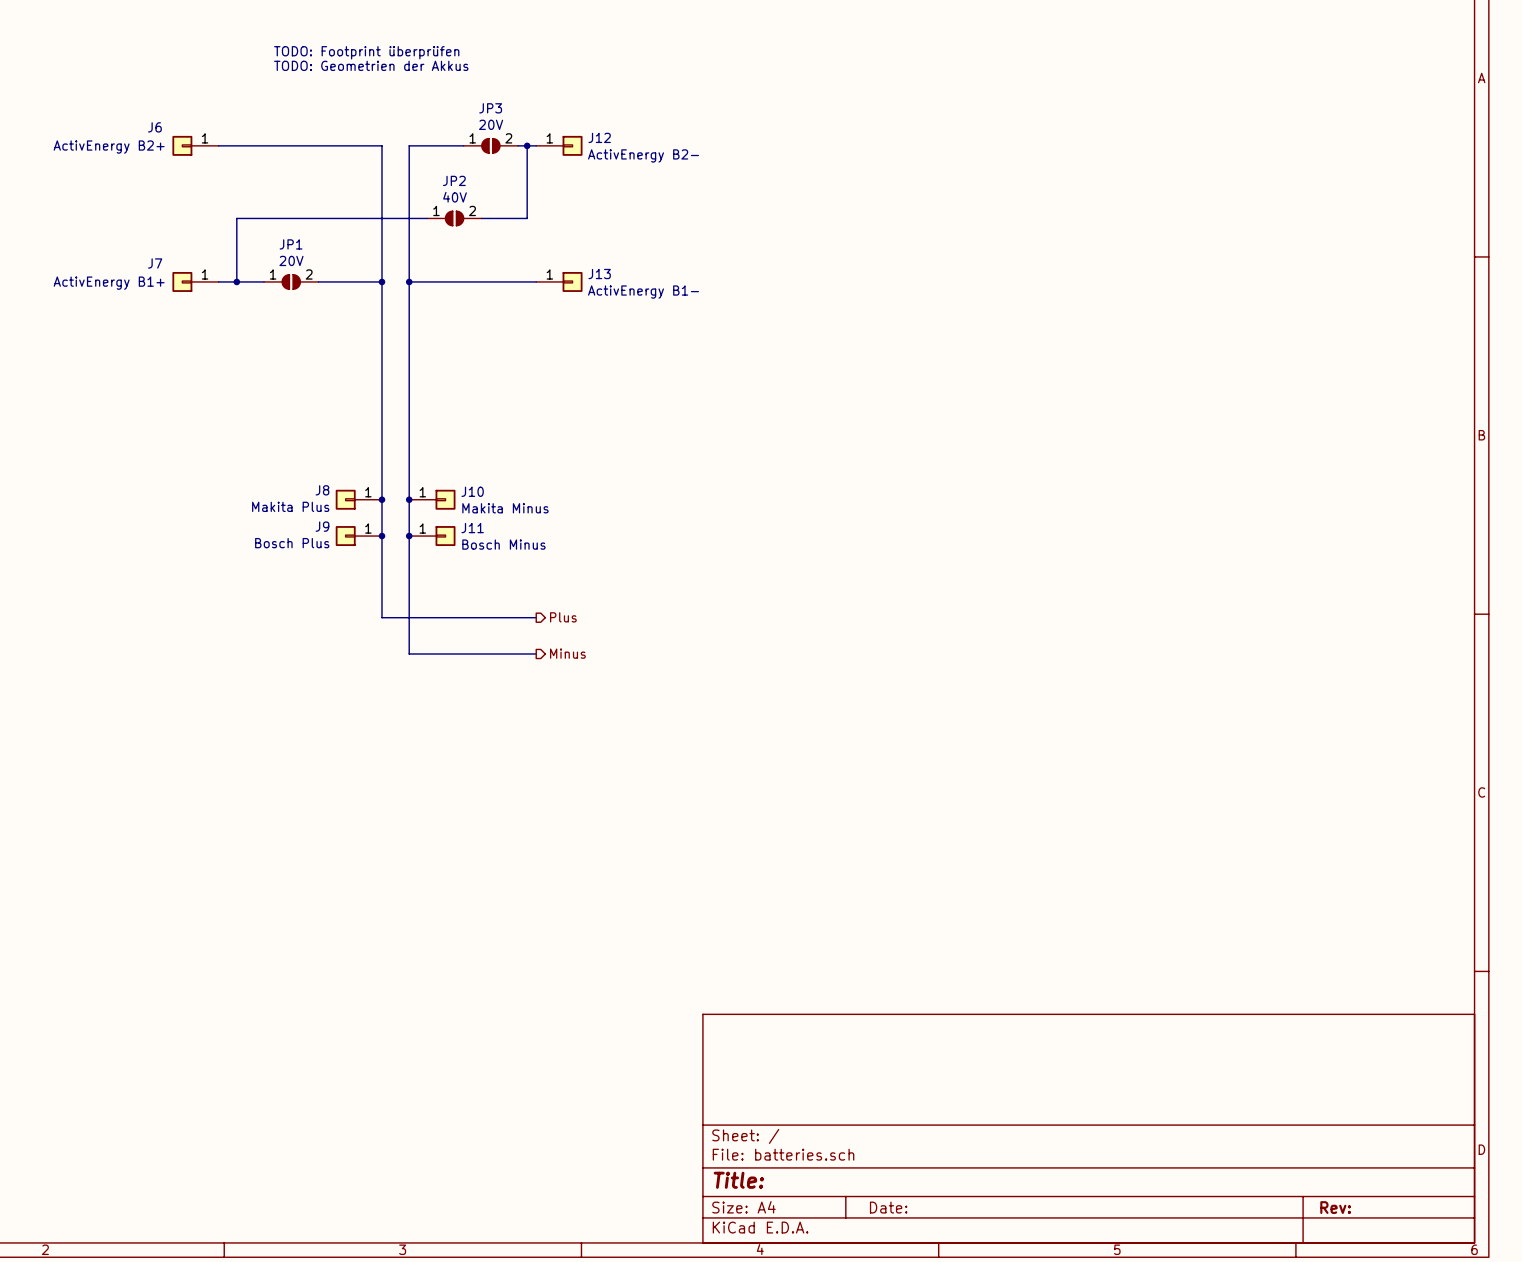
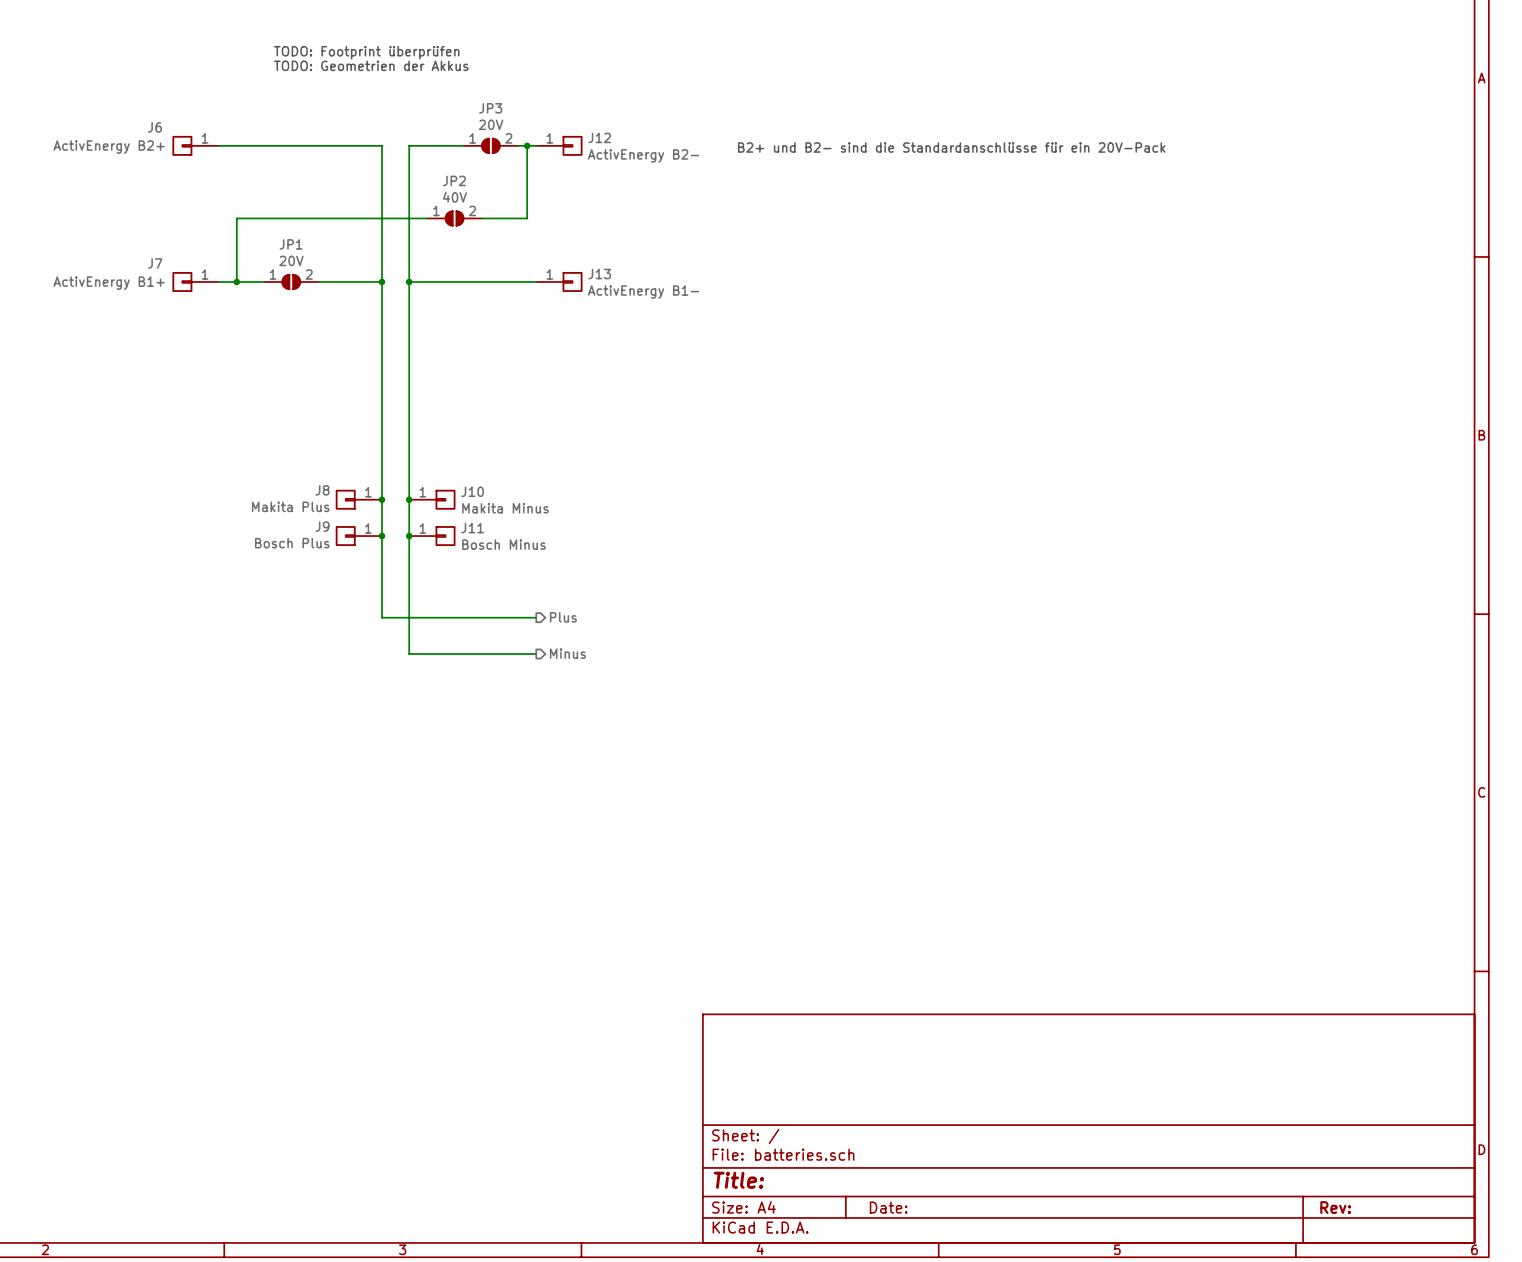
text: none -> B2+ und B2- sind die Standardanschlüsse für ein 20V-Pack (951, 147)

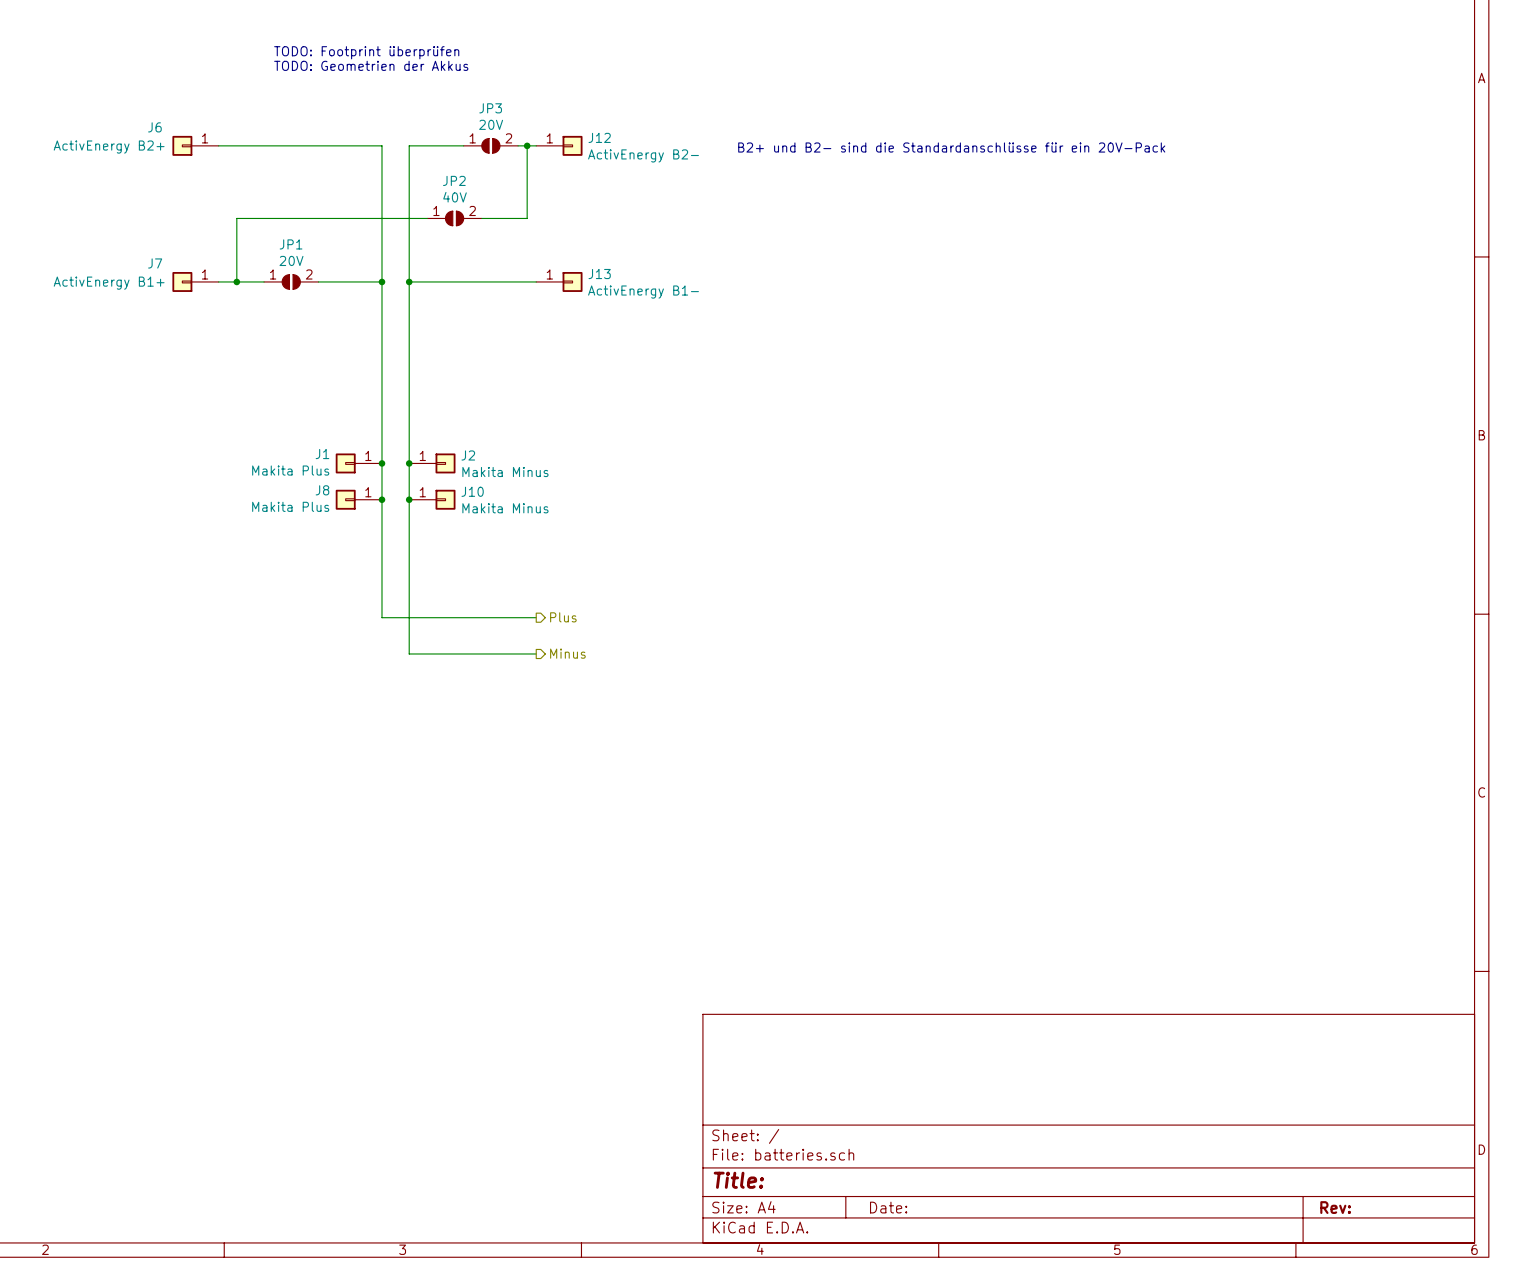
J1: none -> Makita Plus (358, 463)
junction: none -> (381, 463)
junction: none -> (409, 463)
J2: none -> Makita Minus (432, 463)
J9: Bosch Plus (358, 536) -> none
junction: (381, 536) -> none
junction: (409, 536) -> none
J11: Bosch Minus (432, 536) -> none

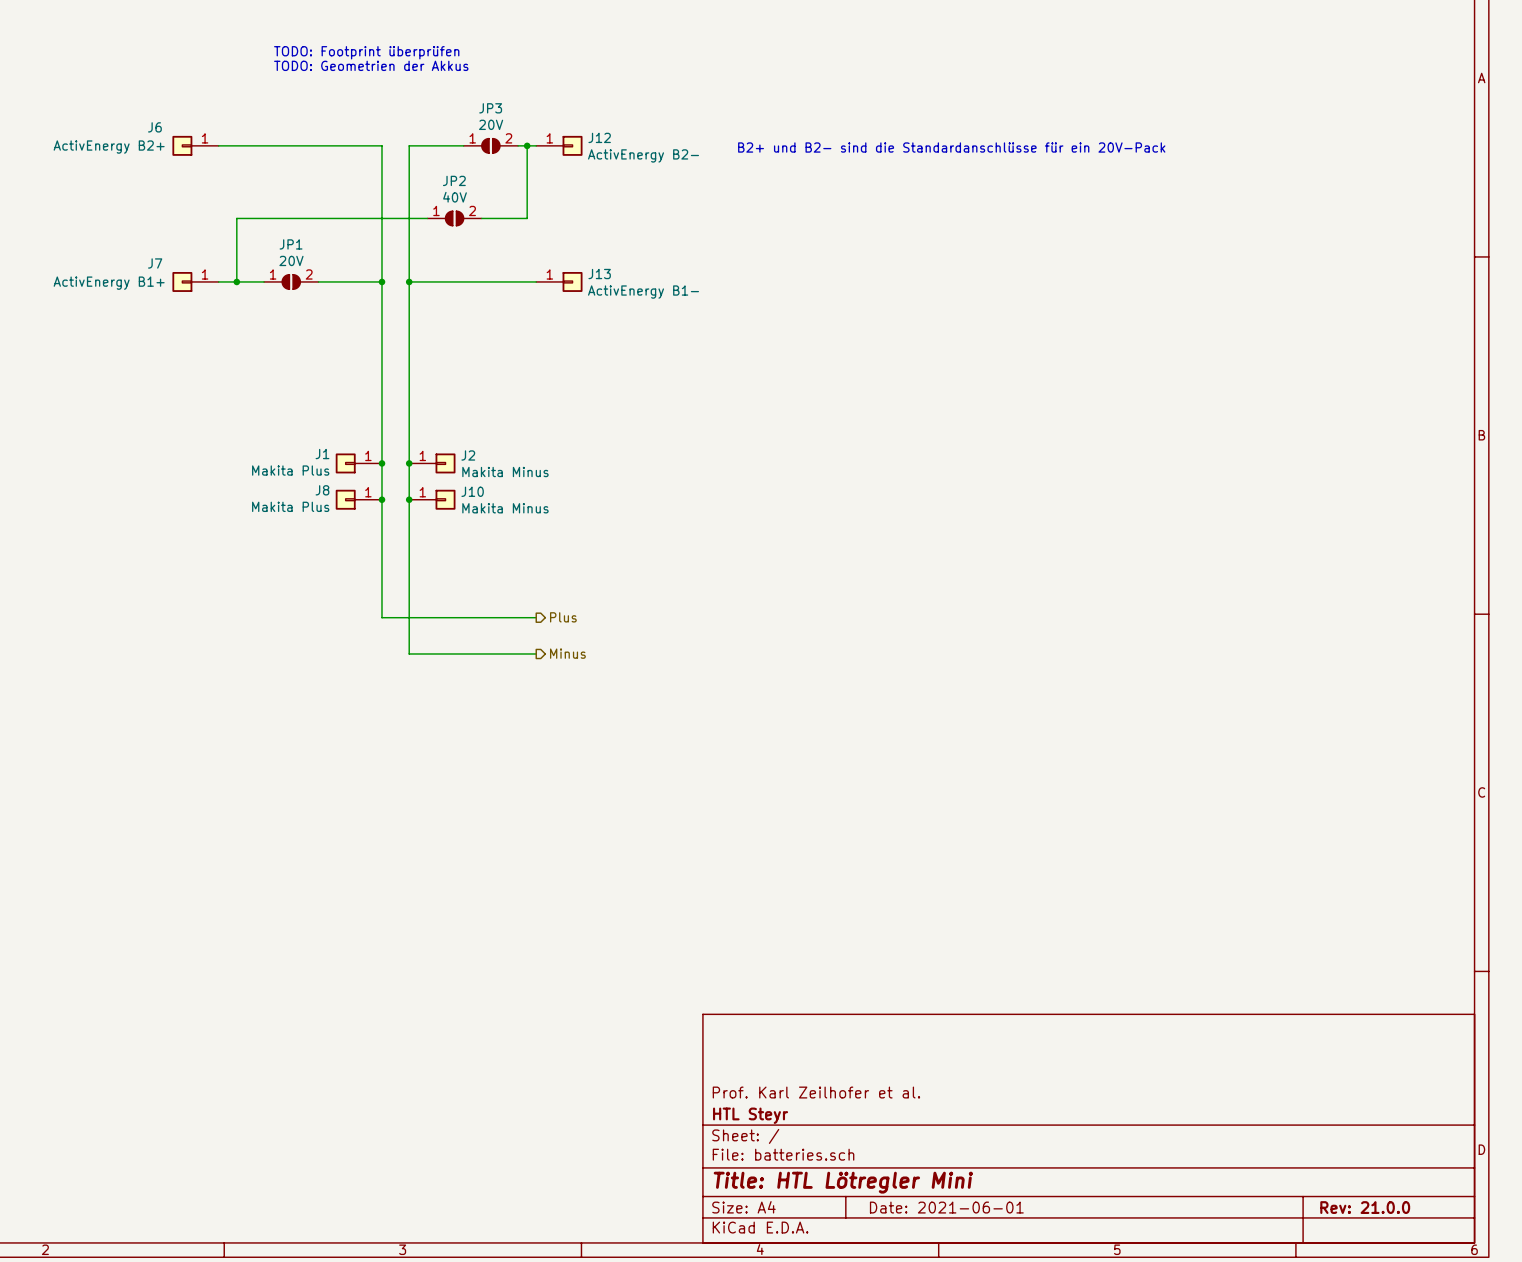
title block: none -> Prof. Karl Zeilhofer et al. (816, 1092)
title block: none -> HTL Steyr (750, 1115)
title block: Title: (738, 1180) -> Title: HTL Lötregler Mini (843, 1182)
title block: Date: (888, 1207) -> Date: 2021-06-01 (946, 1207)
title block: Rev: (1335, 1207) -> Rev: 21.0.0 (1365, 1207)

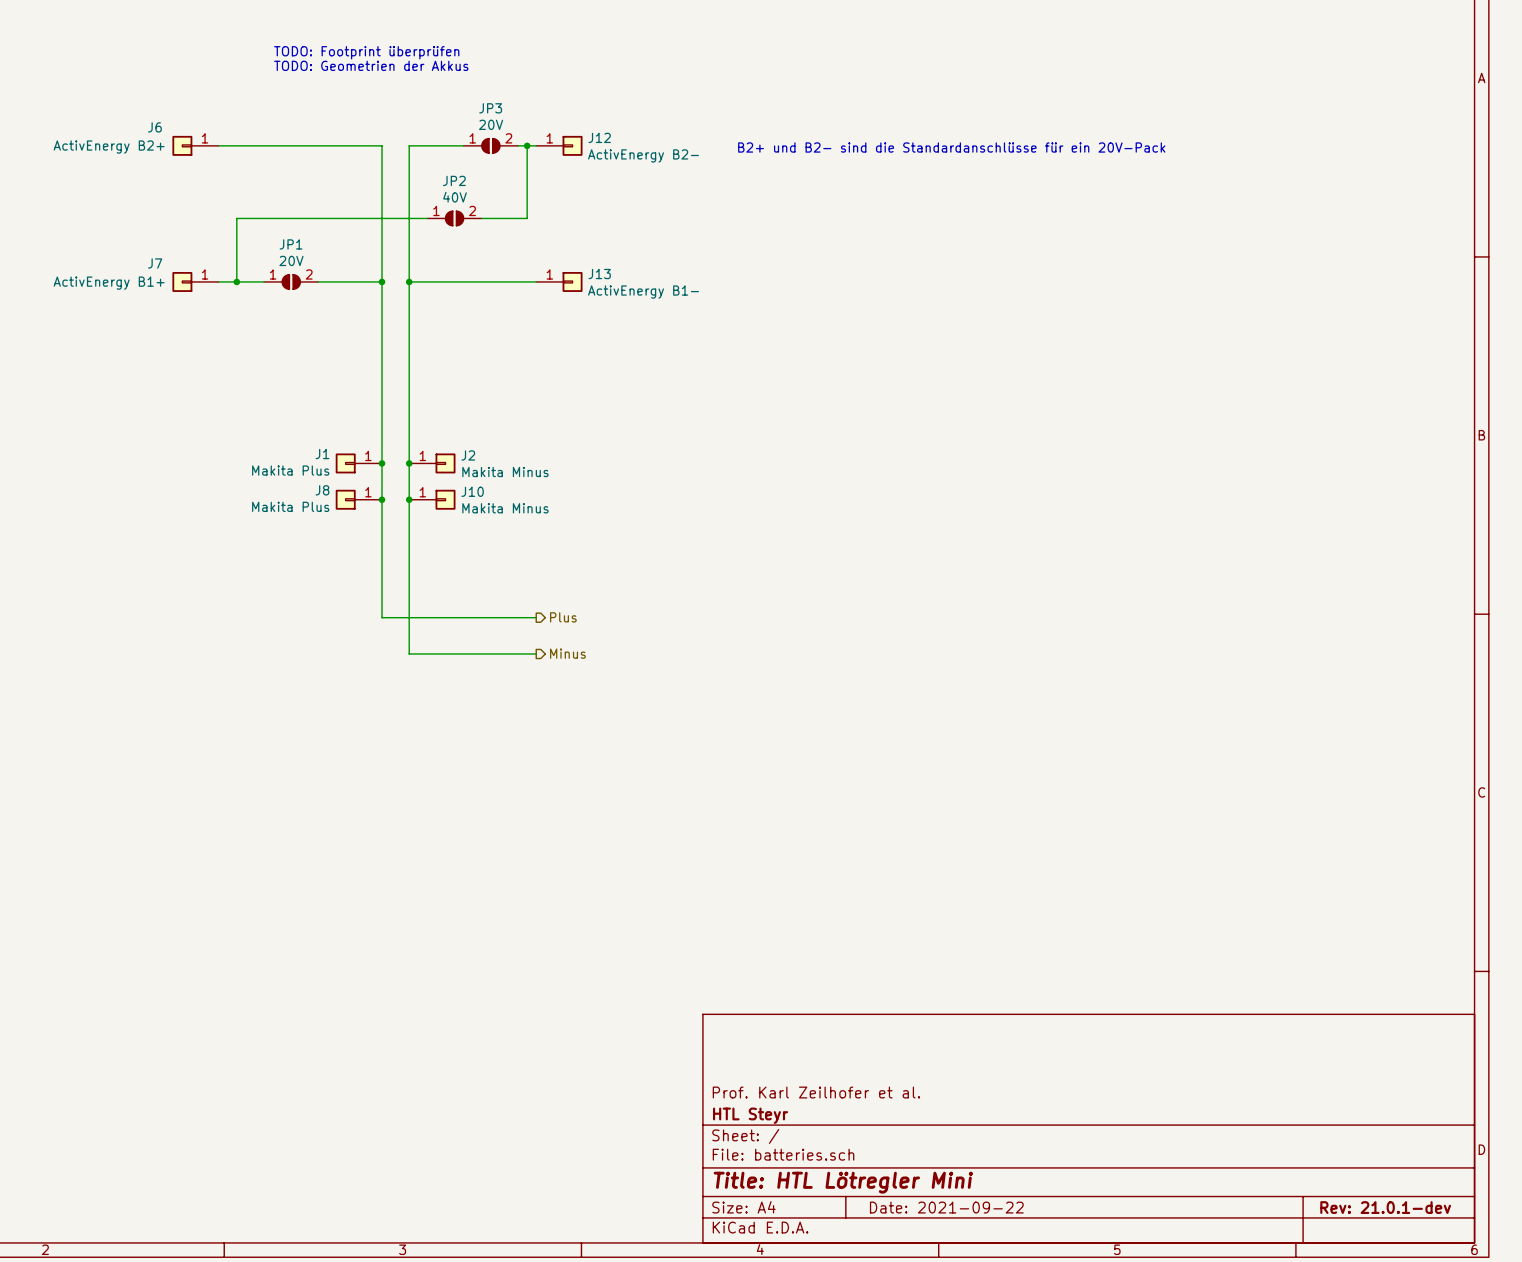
title block: Date: 2021-06-01 (946, 1207) -> Date: 2021-09-22 (946, 1207)
title block: Rev: 21.0.0 (1365, 1207) -> Rev: 21.0.1-dev (1385, 1207)

